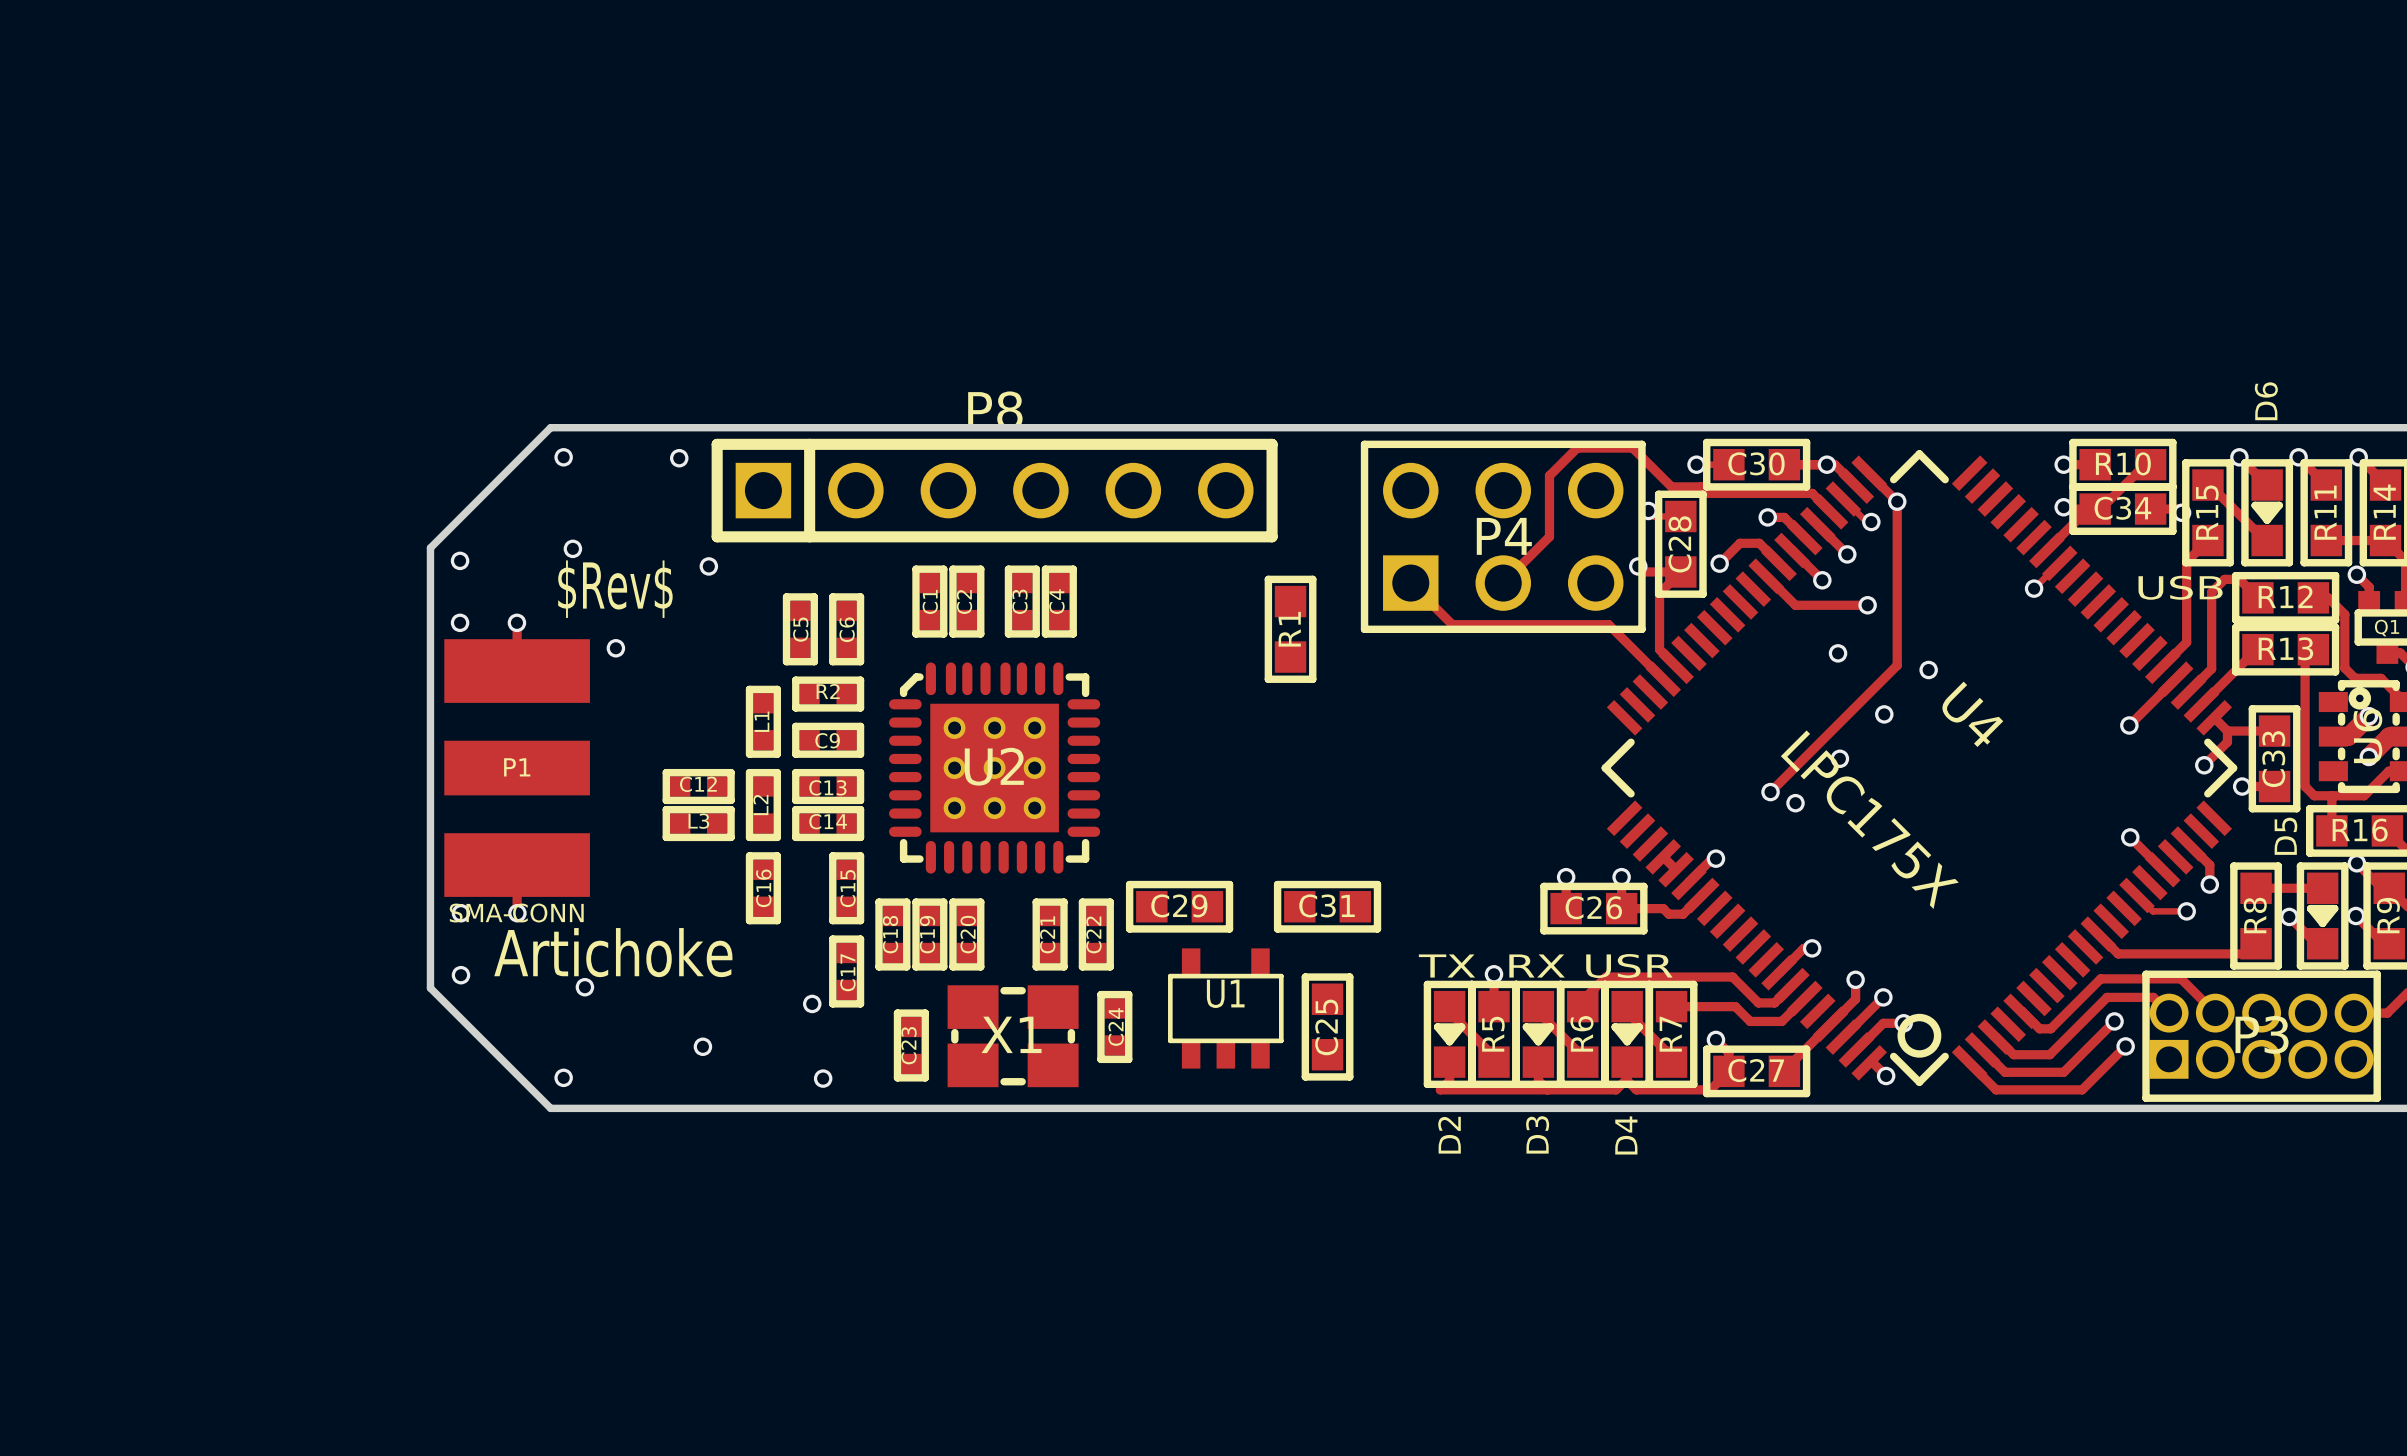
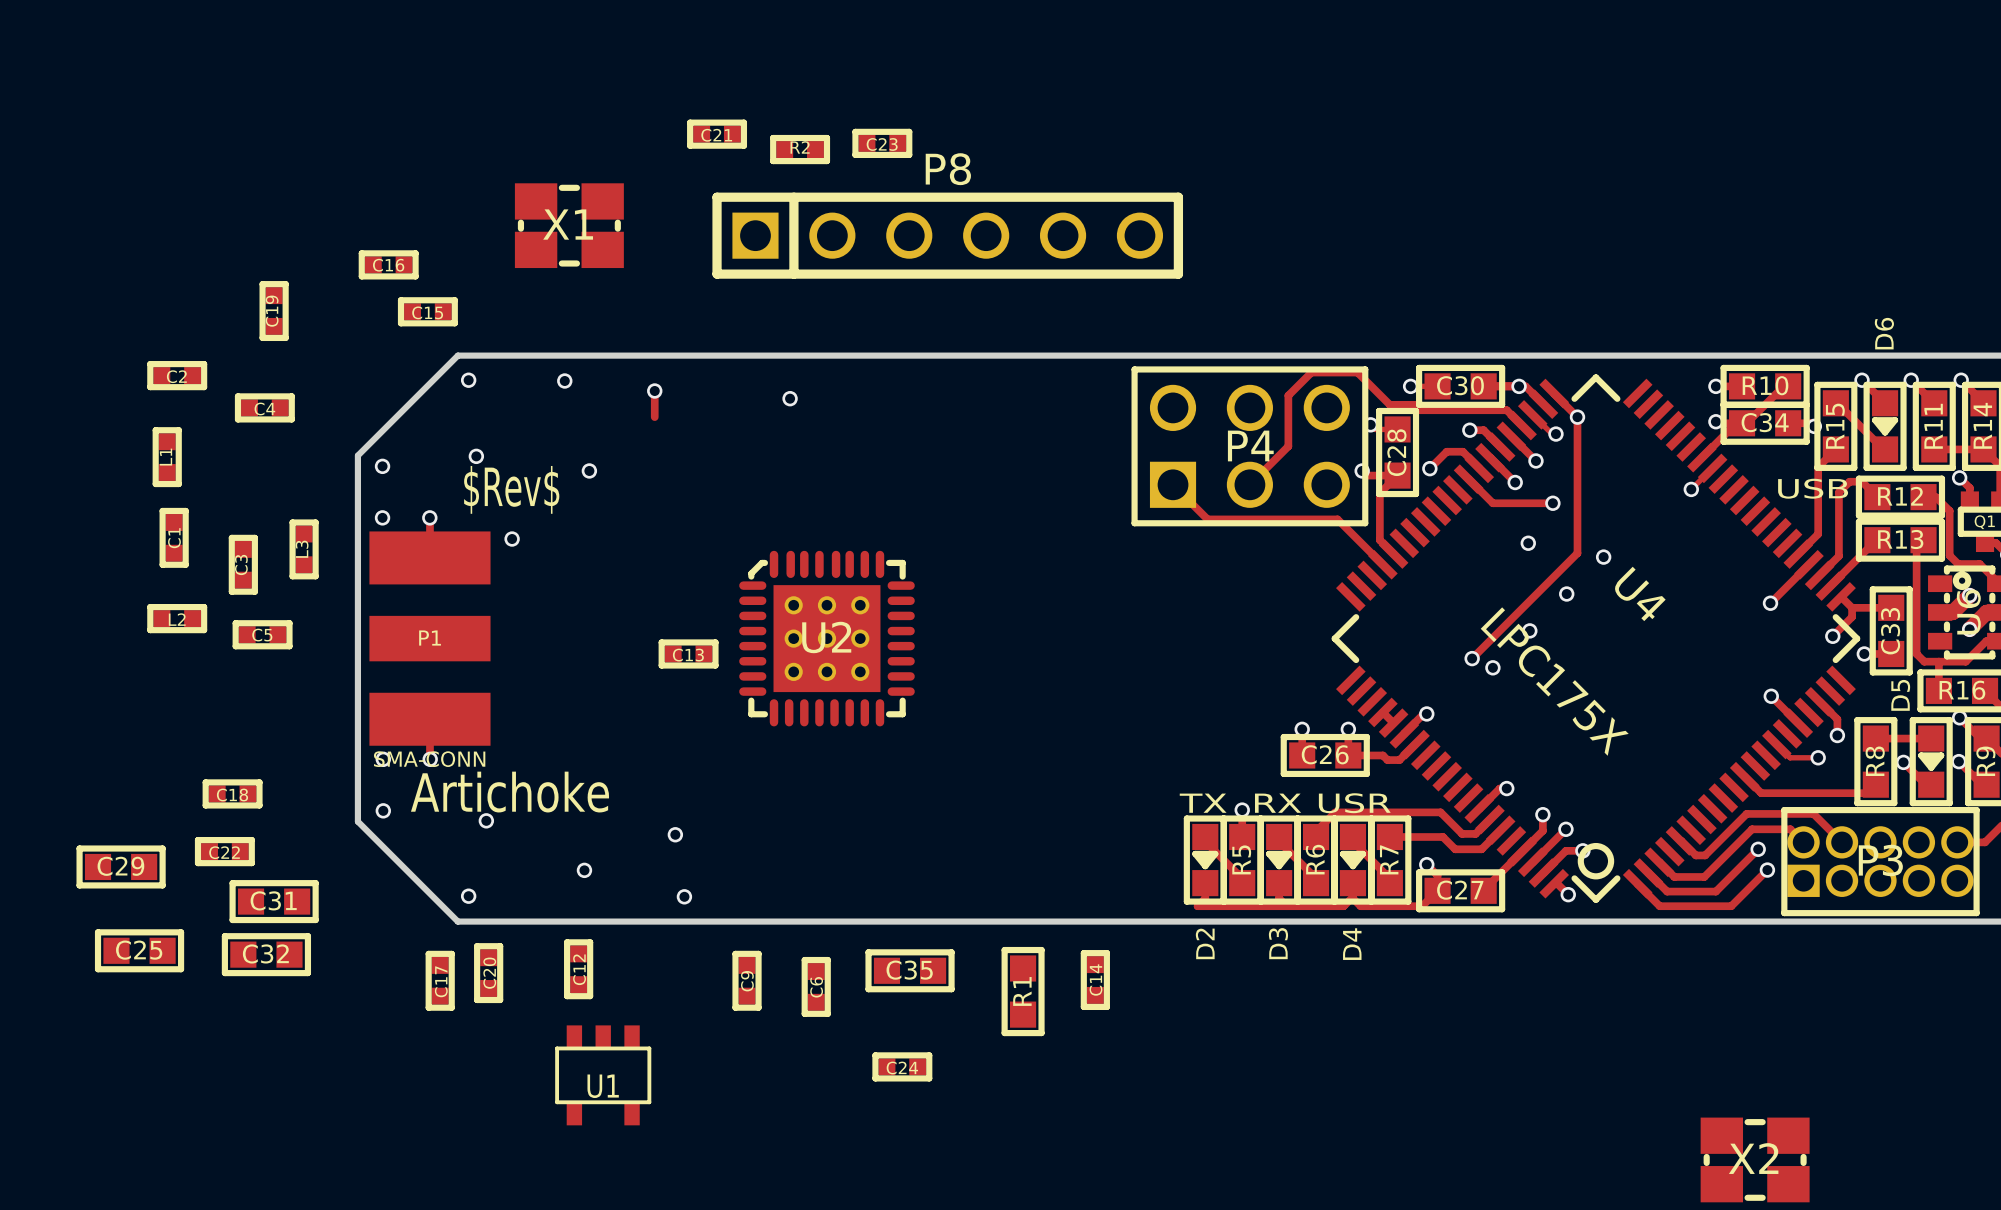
track: none -> (654, 390) (654, 417)
via: none -> (654, 390)
P8 position: (994, 490) -> (947, 235)
C1 position: (929, 601) -> (174, 537)
C2 rotation: 0° (966, 601) -> 90° clockwise (177, 375)
C2 position: (966, 601) -> (177, 375)
C3 position: (1022, 601) -> (243, 564)
C4 rotation: 0° (1059, 601) -> 90° clockwise (264, 407)
C4 position: (1059, 601) -> (264, 407)
C5 rotation: 0° (800, 629) -> 90° clockwise (262, 634)
C5 position: (800, 629) -> (262, 634)
C6 position: (846, 629) -> (816, 986)
R1 position: (1290, 629) -> (1023, 991)
R2 position: (828, 694) -> (800, 149)
L1 position: (763, 721) -> (167, 457)
C9 rotation: 0° (828, 740) -> 90° clockwise (747, 980)
C9 position: (828, 740) -> (747, 980)
C12 rotation: 0° (698, 786) -> 90° clockwise (578, 969)
C12 position: (698, 786) -> (578, 969)
L2 rotation: 0° (763, 805) -> 90° clockwise (177, 618)
L2 position: (763, 805) -> (177, 618)
L3 rotation: 0° (698, 823) -> 90° clockwise (304, 549)
L3 position: (698, 823) -> (304, 549)
C14 rotation: 0° (828, 823) -> 90° clockwise (1095, 980)
C14 position: (828, 823) -> (1095, 980)
C16 rotation: 0° (763, 888) -> 90° clockwise (388, 264)
C16 position: (763, 888) -> (388, 264)
C15 rotation: 0° (846, 888) -> 90° clockwise (427, 311)
C15 position: (846, 888) -> (427, 311)
C29 position: (1179, 906) -> (121, 866)
C31 position: (1327, 906) -> (274, 901)
C18 rotation: 0° (892, 934) -> 90° clockwise (232, 793)
C18 position: (892, 934) -> (232, 793)
C19 position: (929, 934) -> (274, 311)
C20 position: (966, 934) -> (488, 973)
C21 rotation: 0° (1050, 934) -> 90° clockwise (717, 134)
C21 position: (1050, 934) -> (717, 134)
C22 rotation: 0° (1096, 934) -> 90° clockwise (224, 851)
C22 position: (1096, 934) -> (224, 851)
C17 position: (846, 971) -> (440, 980)
U1 rotation: 0° (1225, 1008) -> 180° (603, 1075)
U1 position: (1225, 1008) -> (603, 1075)
C24 rotation: 0° (1114, 1026) -> 90° clockwise (902, 1066)
C24 position: (1114, 1026) -> (902, 1066)
C25 rotation: 0° (1327, 1026) -> 90° clockwise (139, 950)
C25 position: (1327, 1026) -> (139, 950)
X1 position: (1013, 1036) -> (569, 225)
C23 rotation: 0° (911, 1045) -> 90° clockwise (882, 143)
C23 position: (911, 1045) -> (882, 143)
C32: none -> (266, 954)
C35: none -> (910, 970)
X2: none -> (1755, 1159)

